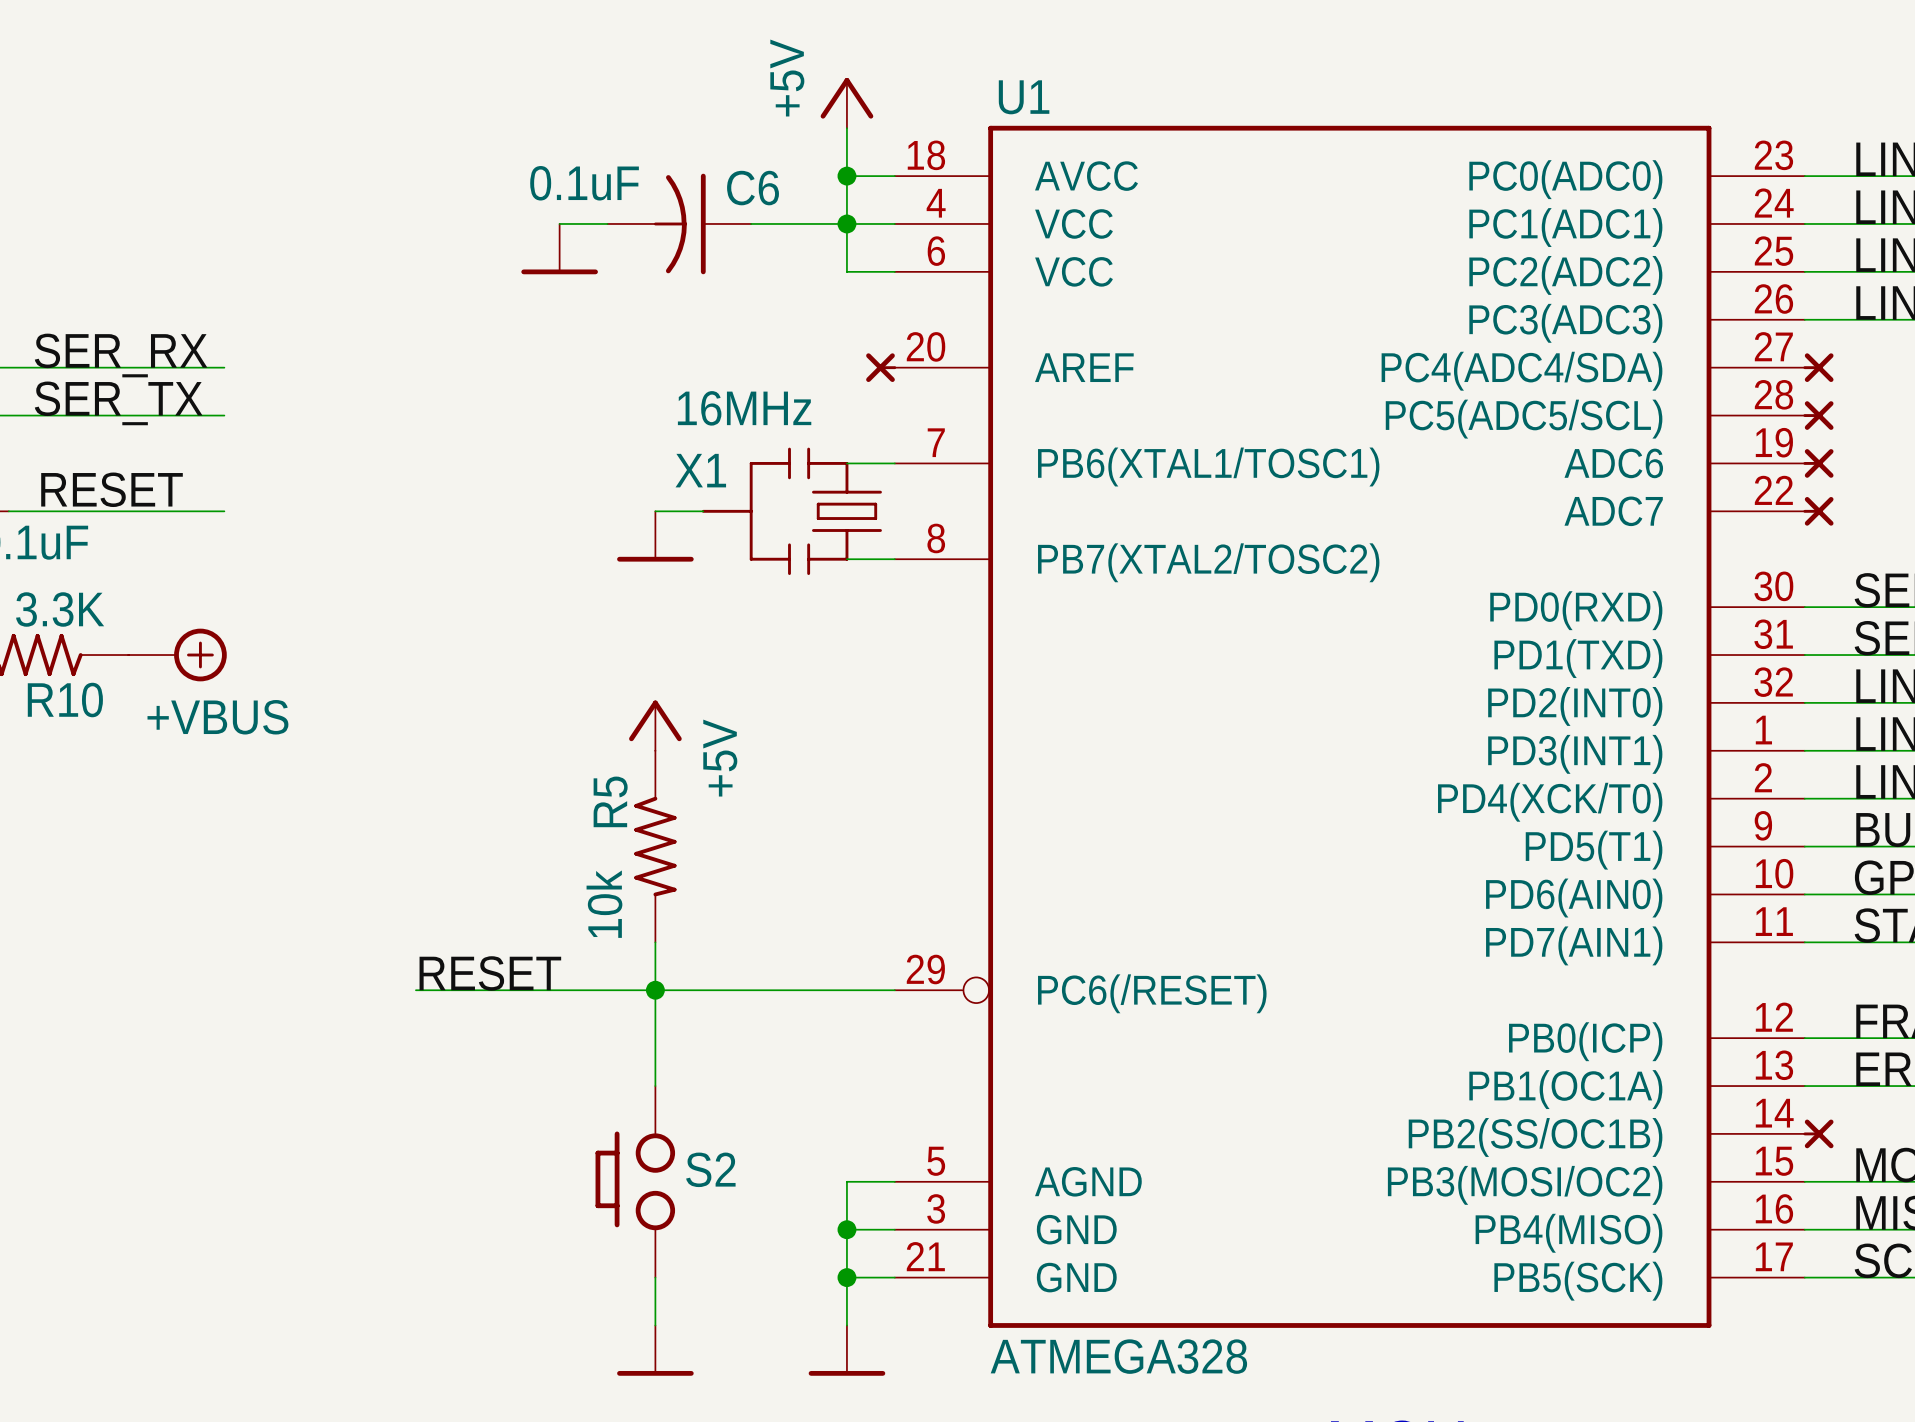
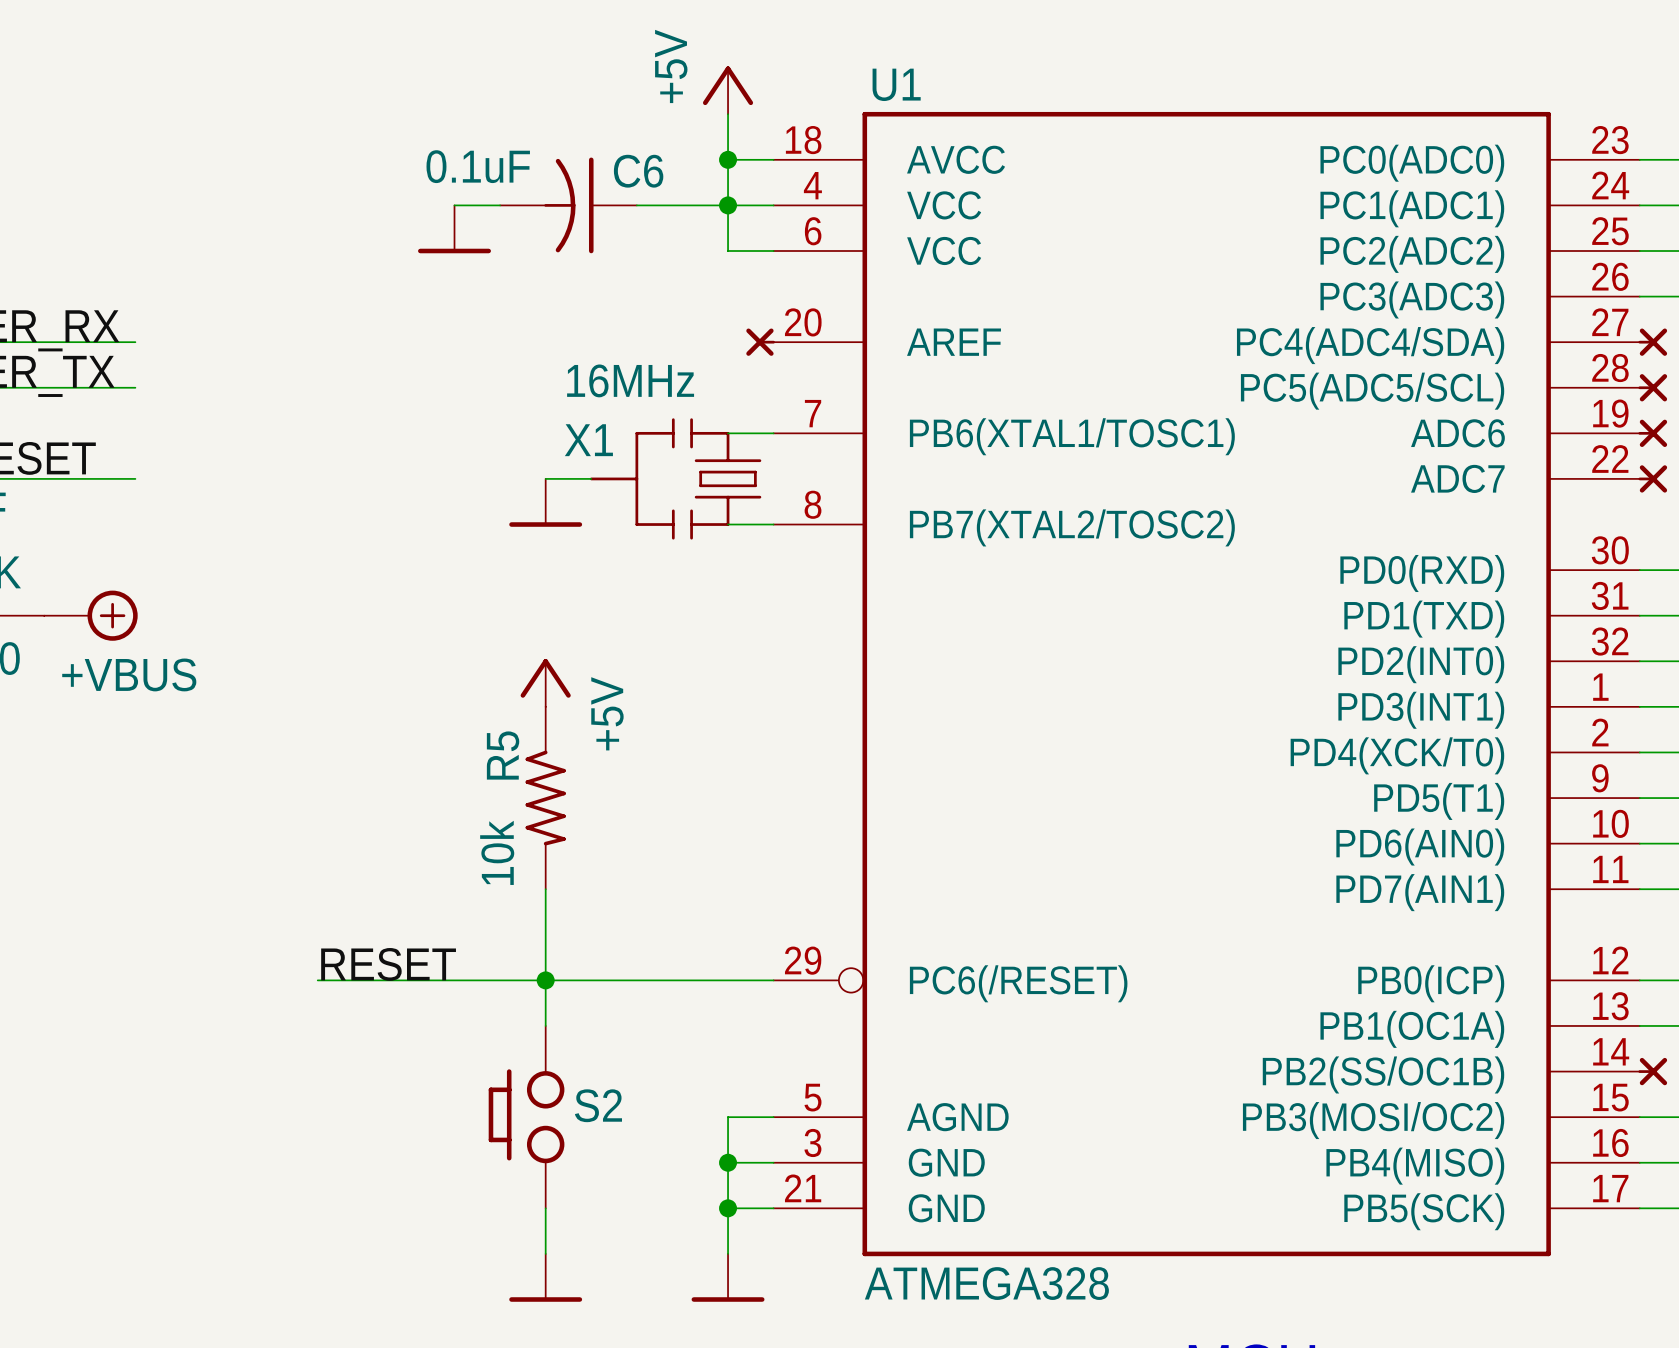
U1 symbol: [894, 125, 1805, 1328] -> [773, 111, 1640, 1257]
label position: RESET (490, 973) -> RESET (388, 964)
wire: (415, 990) (894, 990) -> (317, 980) (773, 980)
junction position: (655, 990) -> (545, 980)

